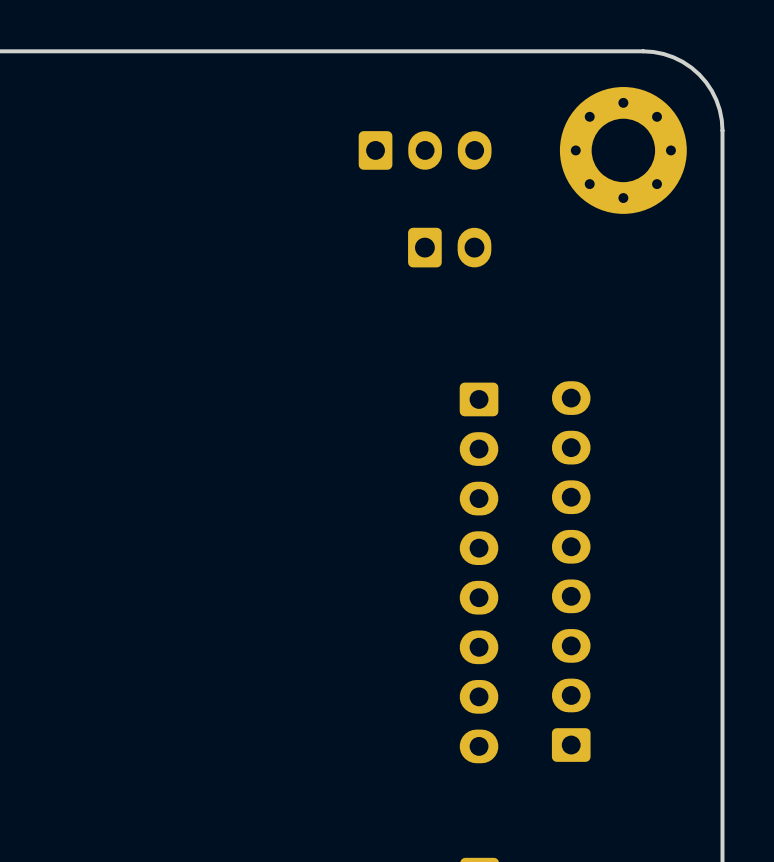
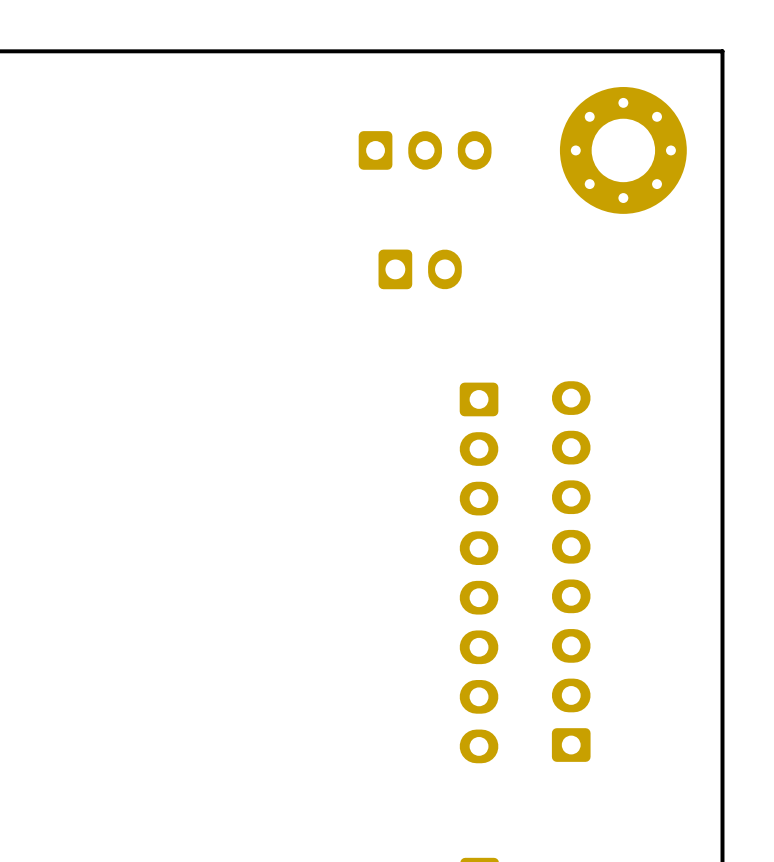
board edge: (643, 51) (673, 57) (699, 74) (716, 100) (722, 130) -> (643, 51) (722, 51) (722, 130)
part position: (449, 247) -> (420, 269)

